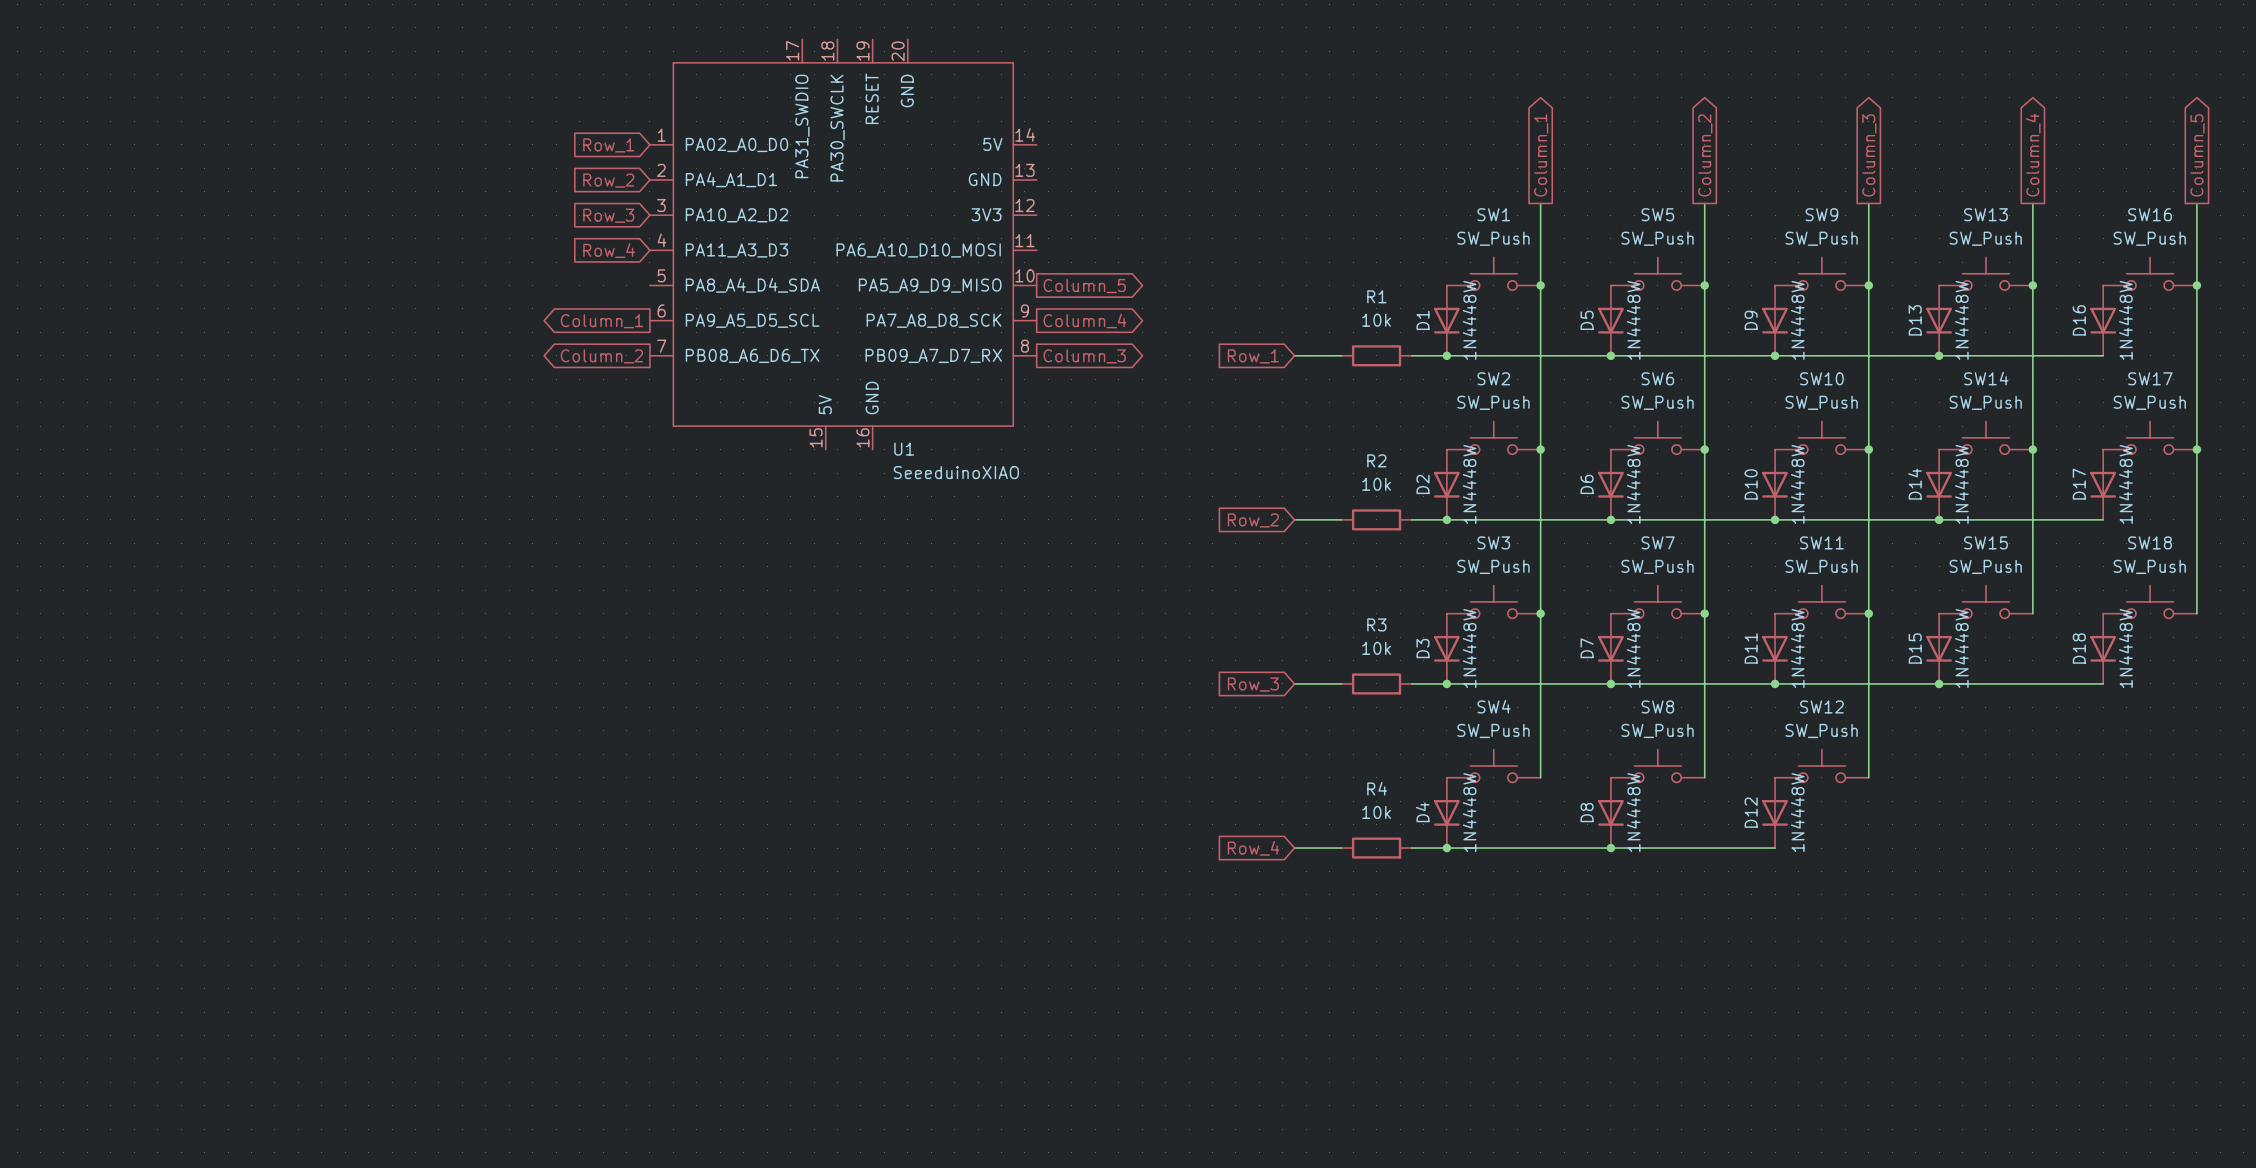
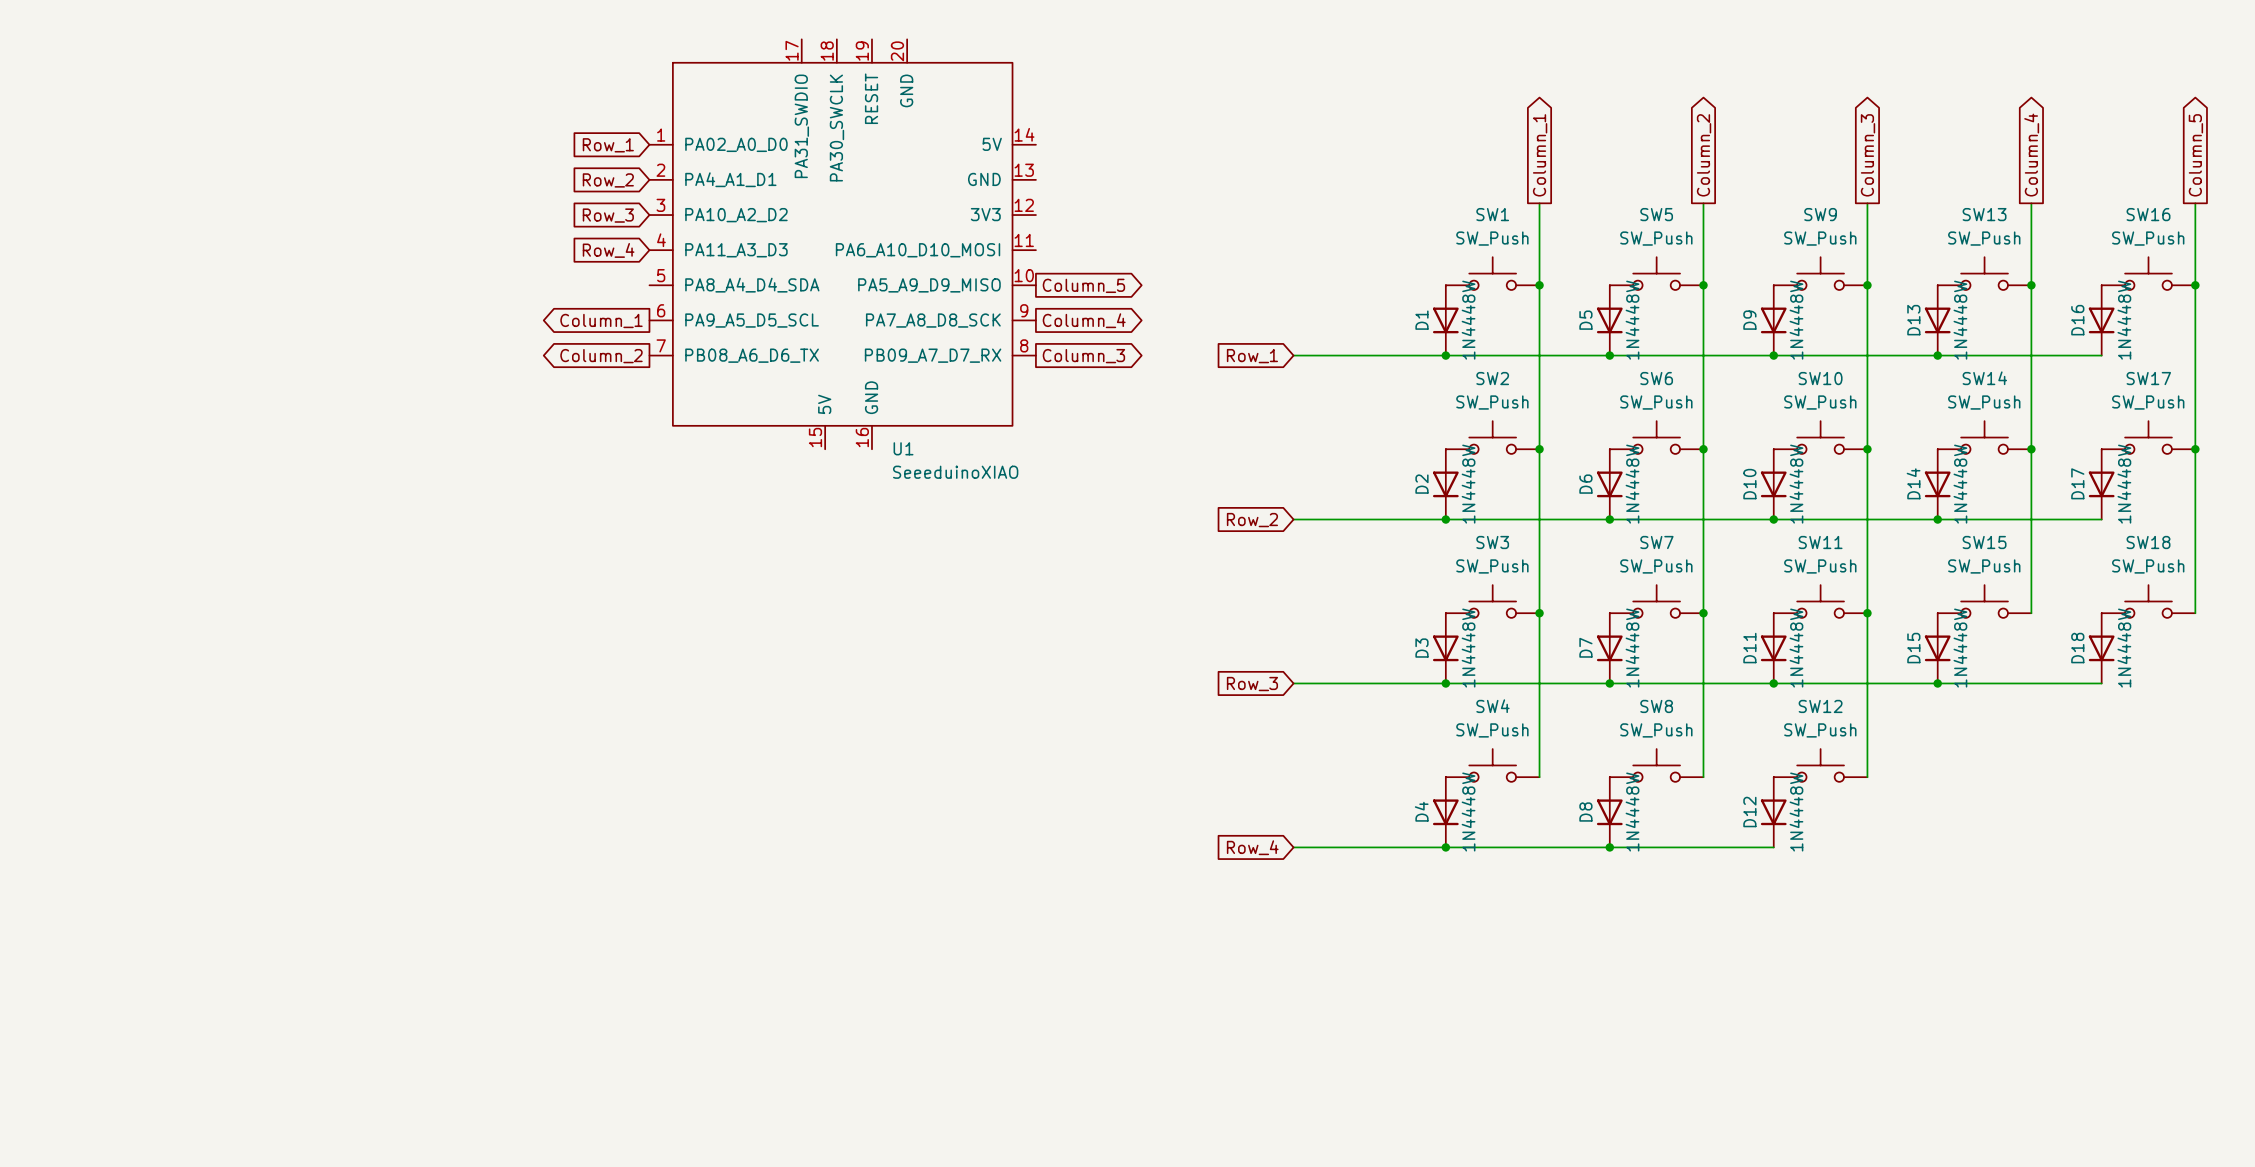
wire: none -> (1340, 355) (1410, 355)
R1: 10k (1376, 355) -> none
wire: none -> (1340, 519) (1410, 519)
R2: 10k (1376, 519) -> none
wire: none -> (1340, 683) (1410, 683)
R3: 10k (1376, 683) -> none
wire: none -> (1340, 847) (1410, 847)
R4: 10k (1376, 848) -> none

